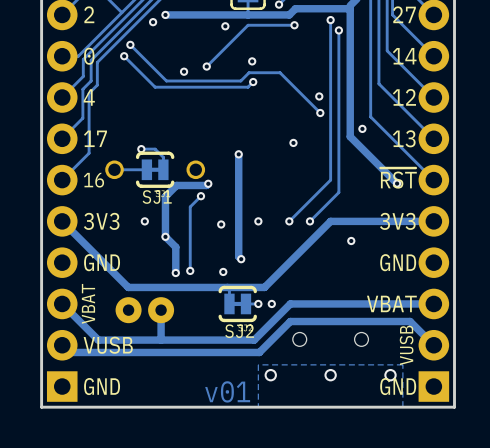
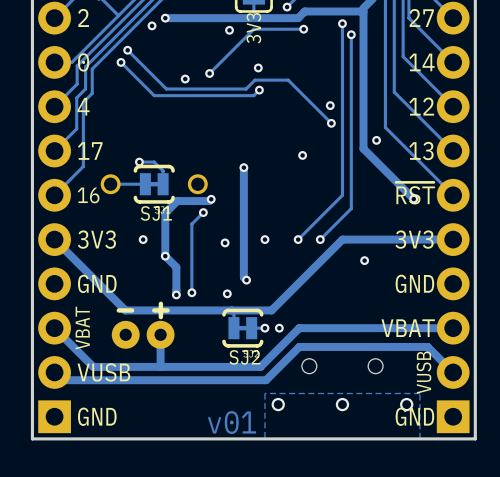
text: none -> 3V3 (253, 28)
line: none -> (160, 303) (160, 317)
line: none -> (132, 310) (118, 310)
line: none -> (167, 310) (154, 310)

